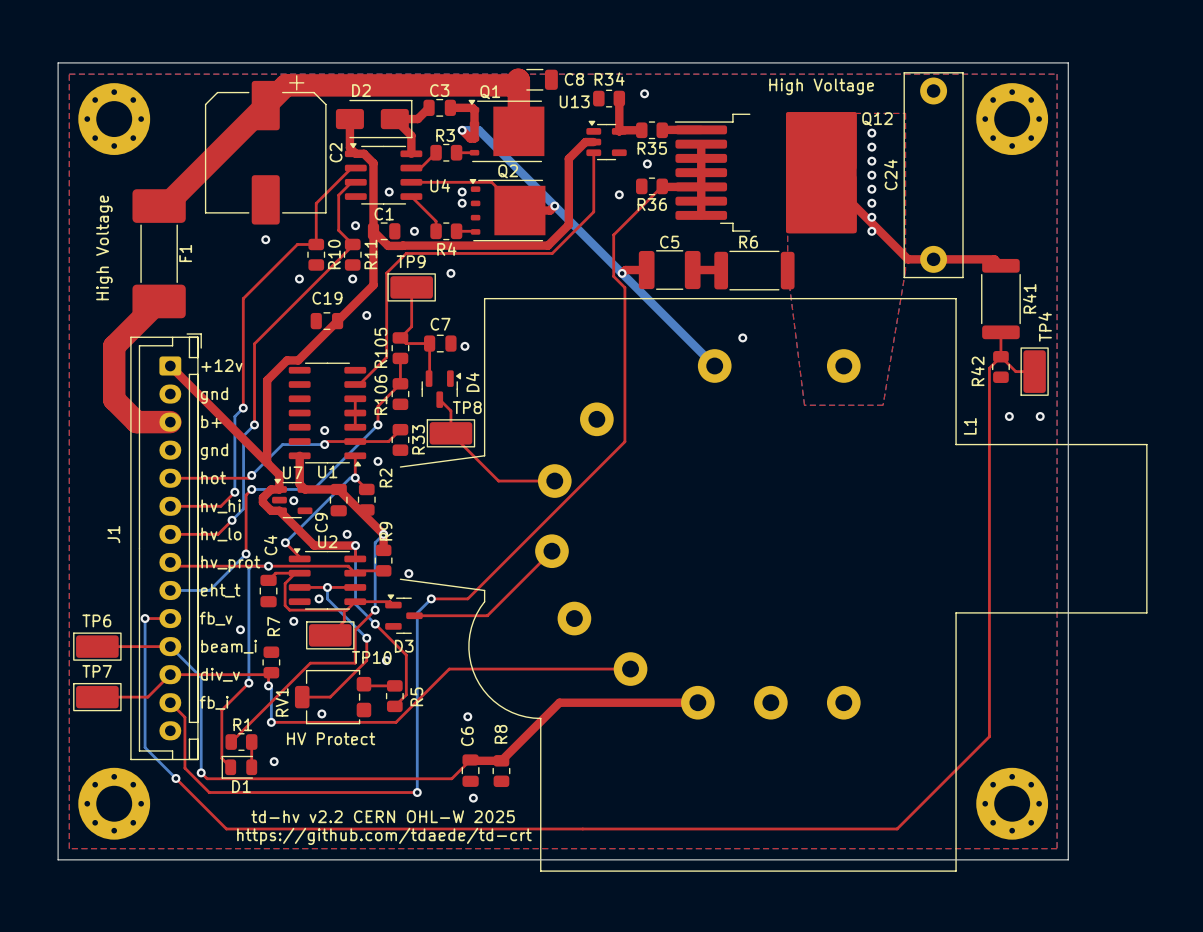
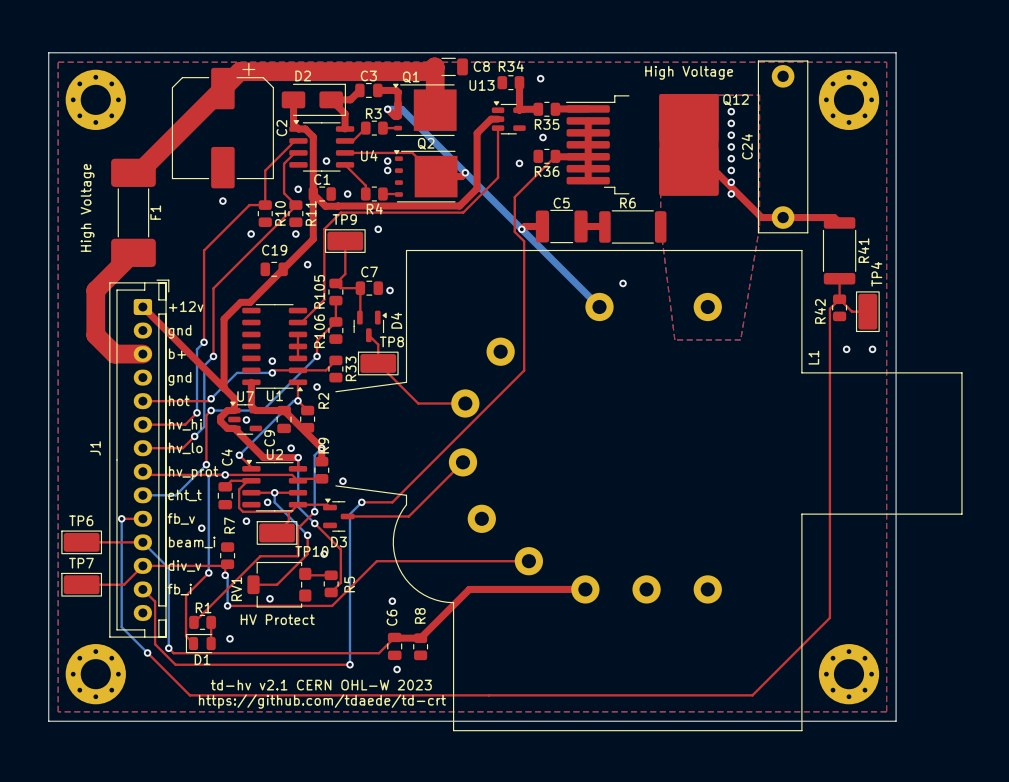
text: td-hv v2.2 CERN OHL-W 2025 (383, 816) -> td-hv v2.1 CERN OHL-W 2023 (321, 685)

